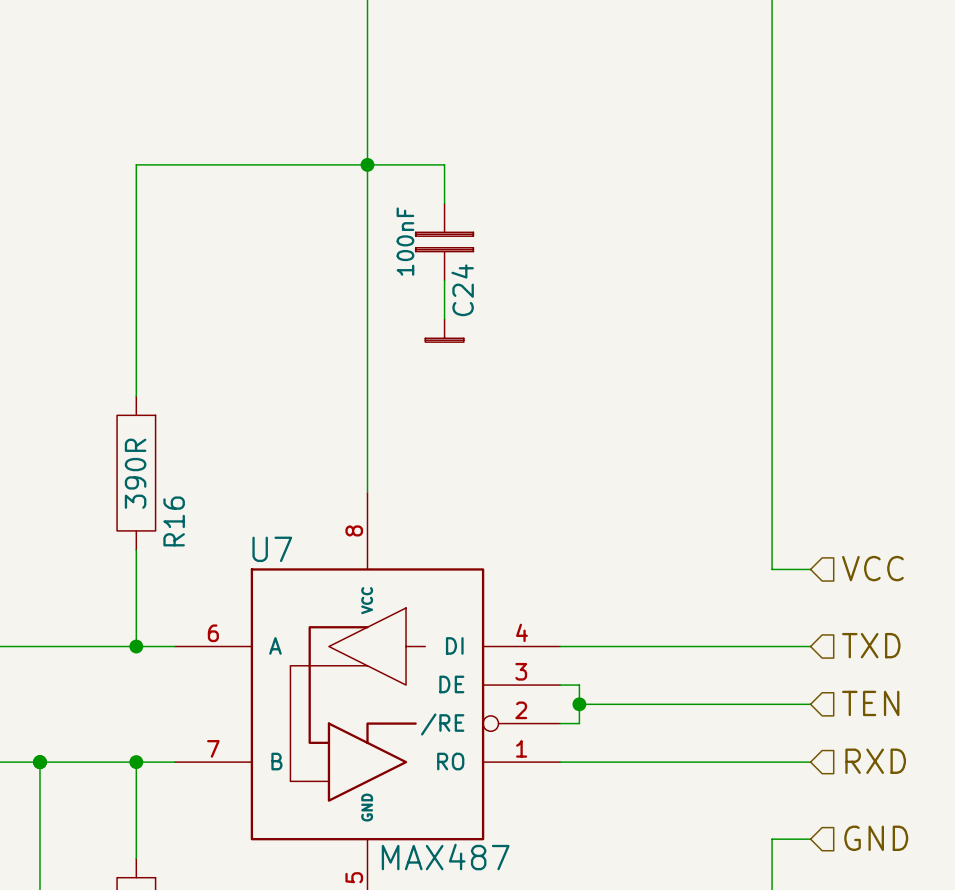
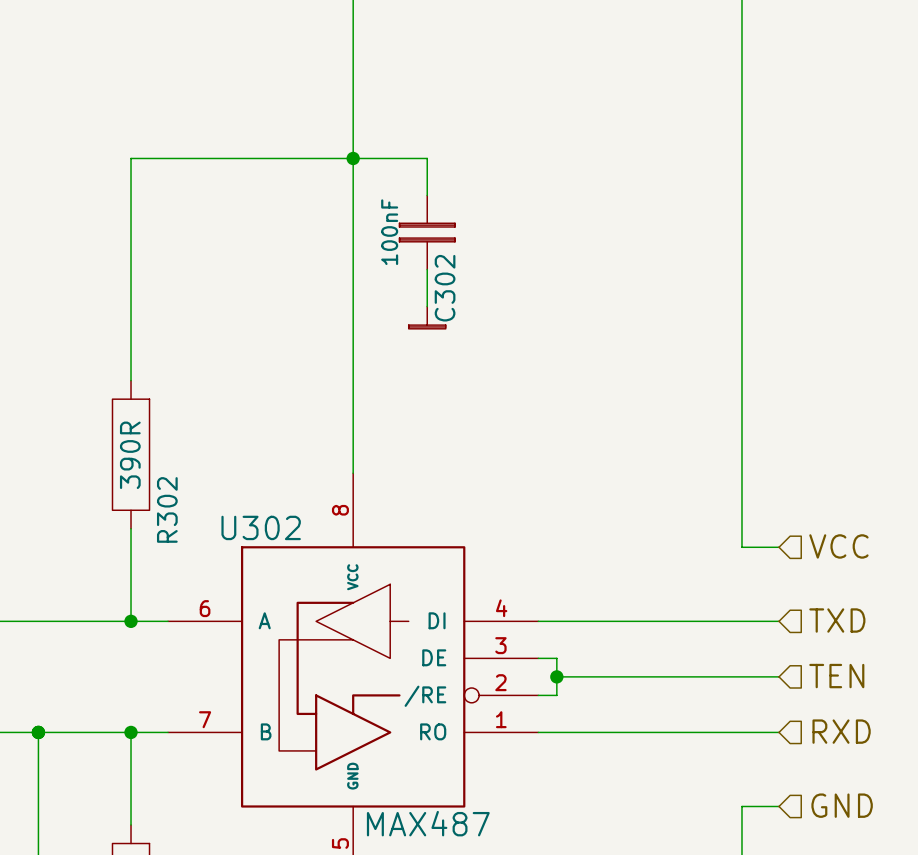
C24 name: C24 (462, 290) -> C302 (445, 288)
R16 name: R16 (174, 521) -> R302 (167, 509)
U7 name: U7 (272, 549) -> U302 (261, 527)

